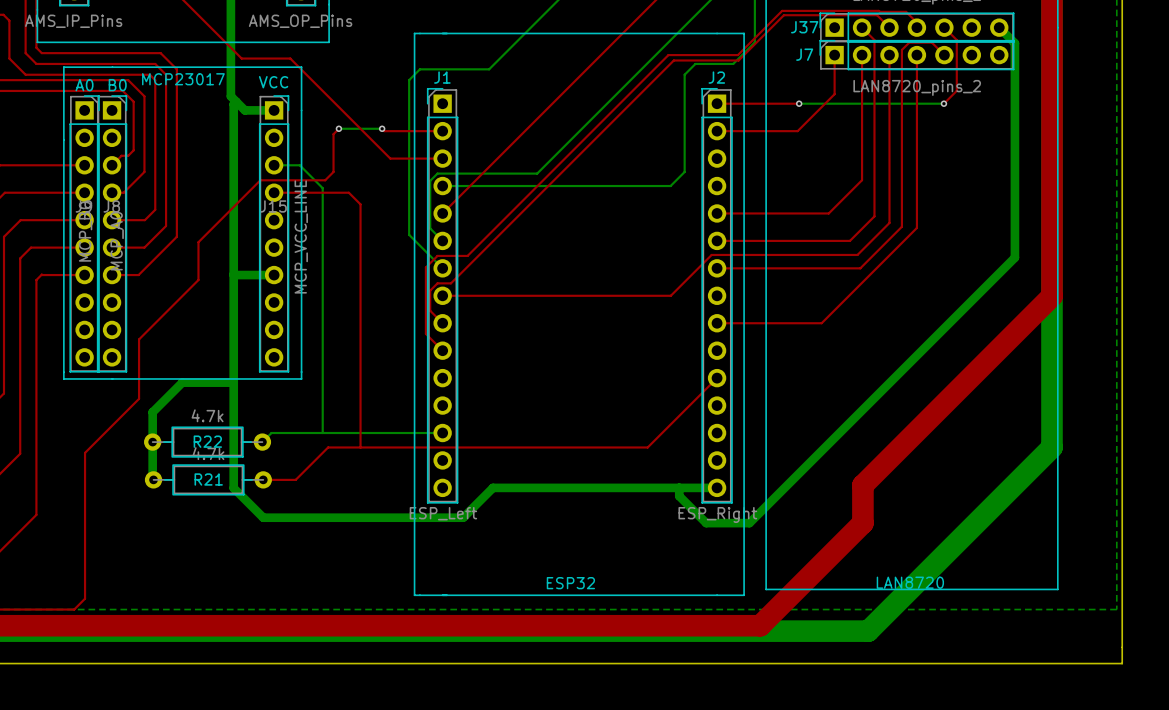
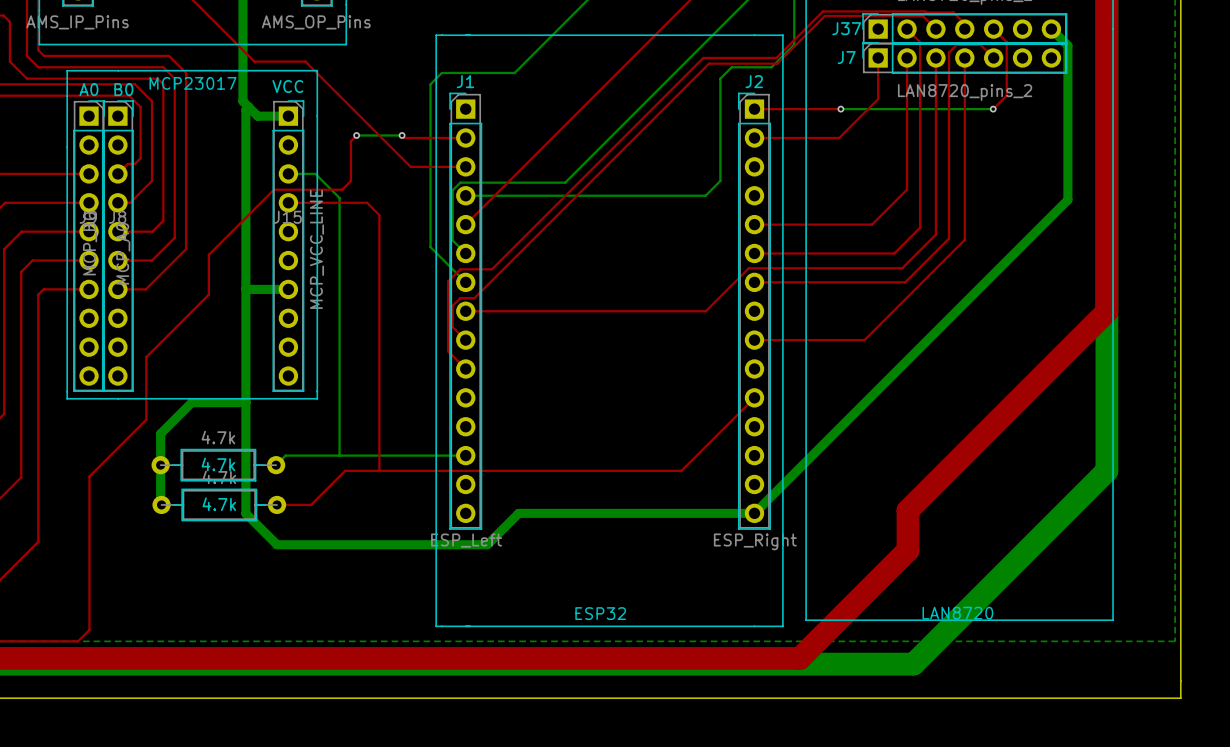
bottom track: (1014, 190) (1014, 257) (749, 523) (706, 523) (679, 496) (679, 487) -> (1067, 199) (754, 513)
R22 name: R22 (207, 441) -> 4.7k (218, 464)
R21 name: R21 (208, 479) -> 4.7k (219, 504)

